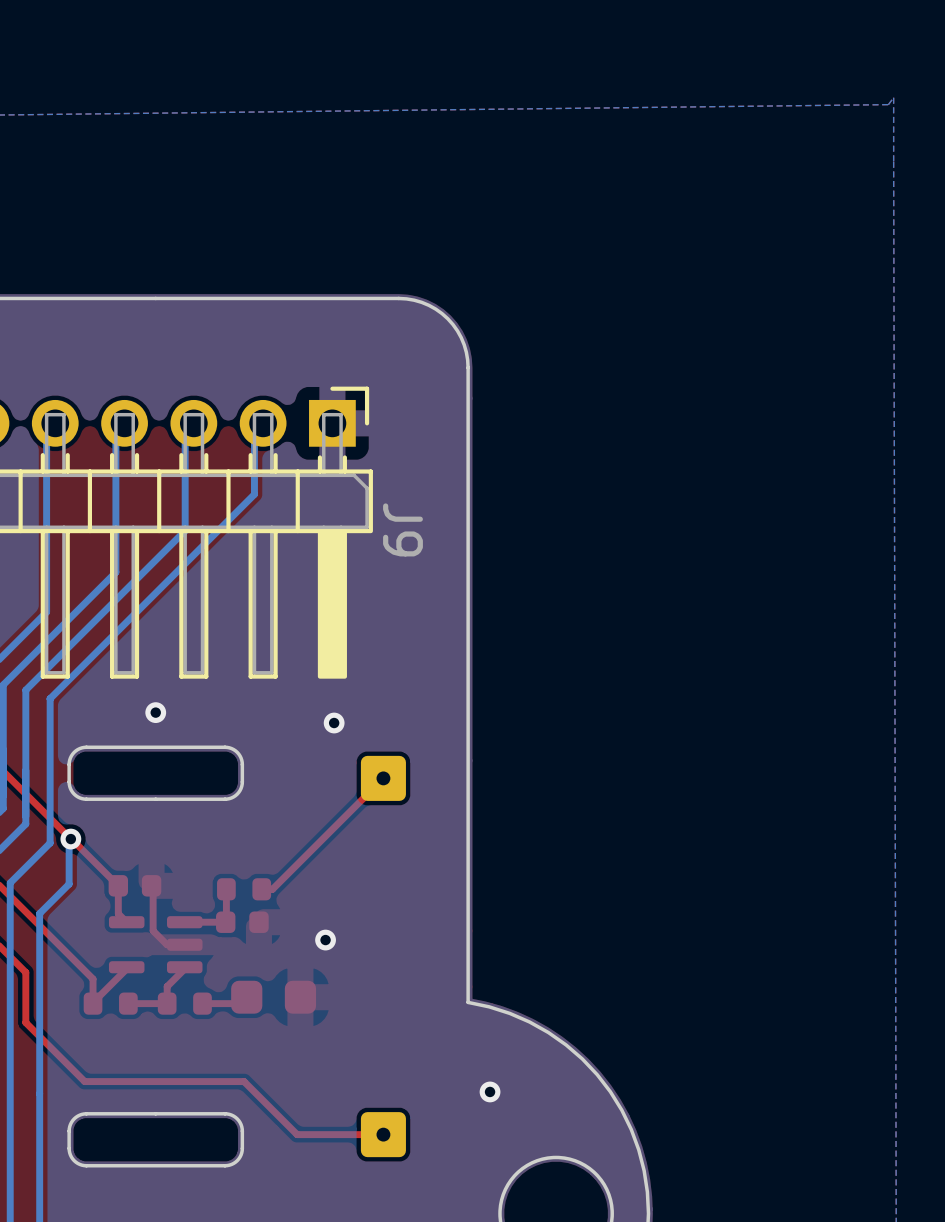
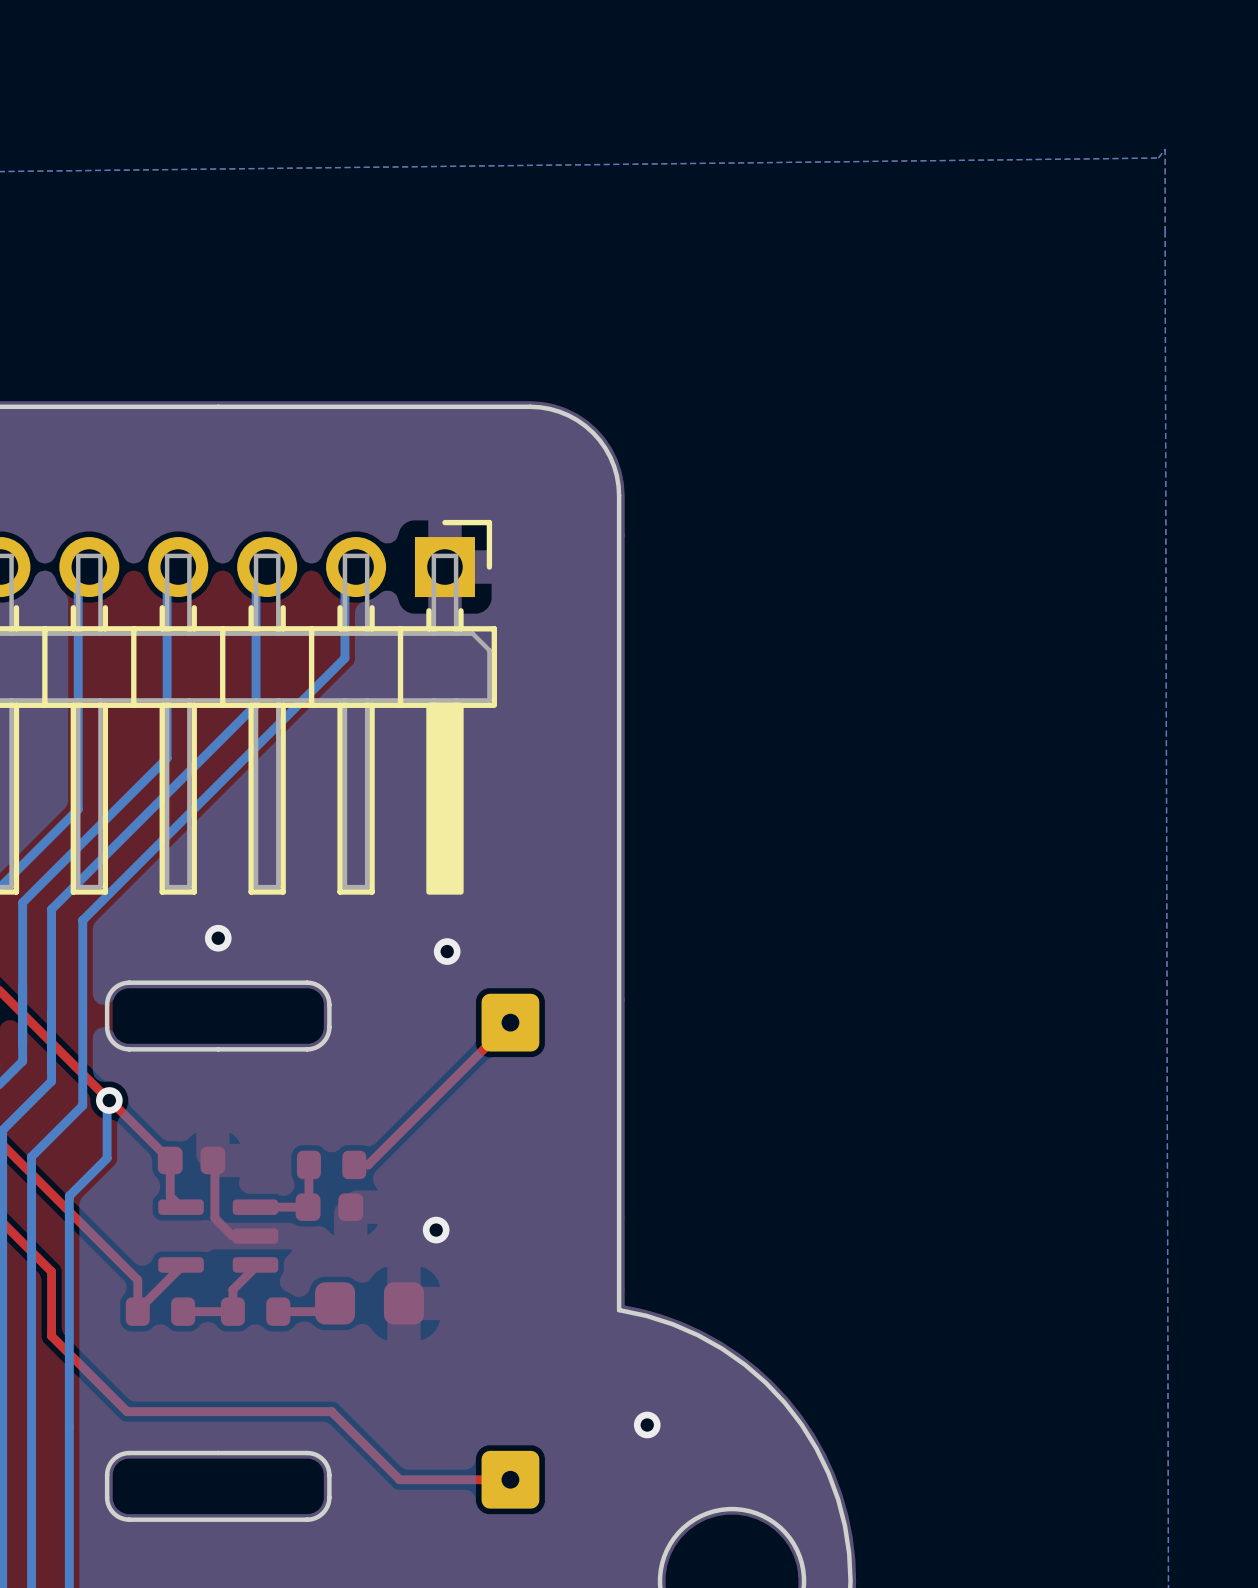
J9 name: J9 (402, 529) -> none

